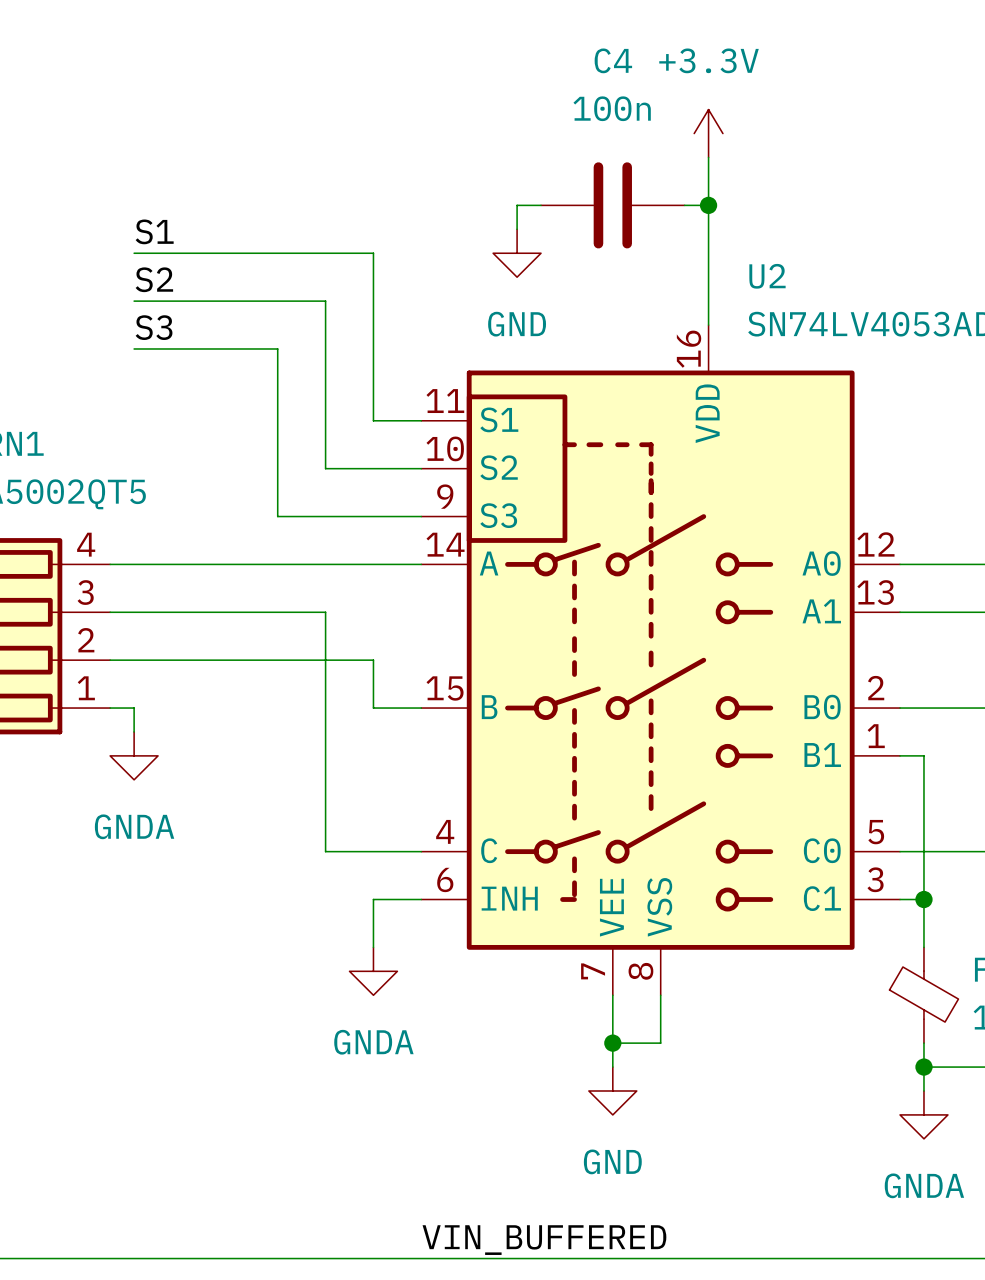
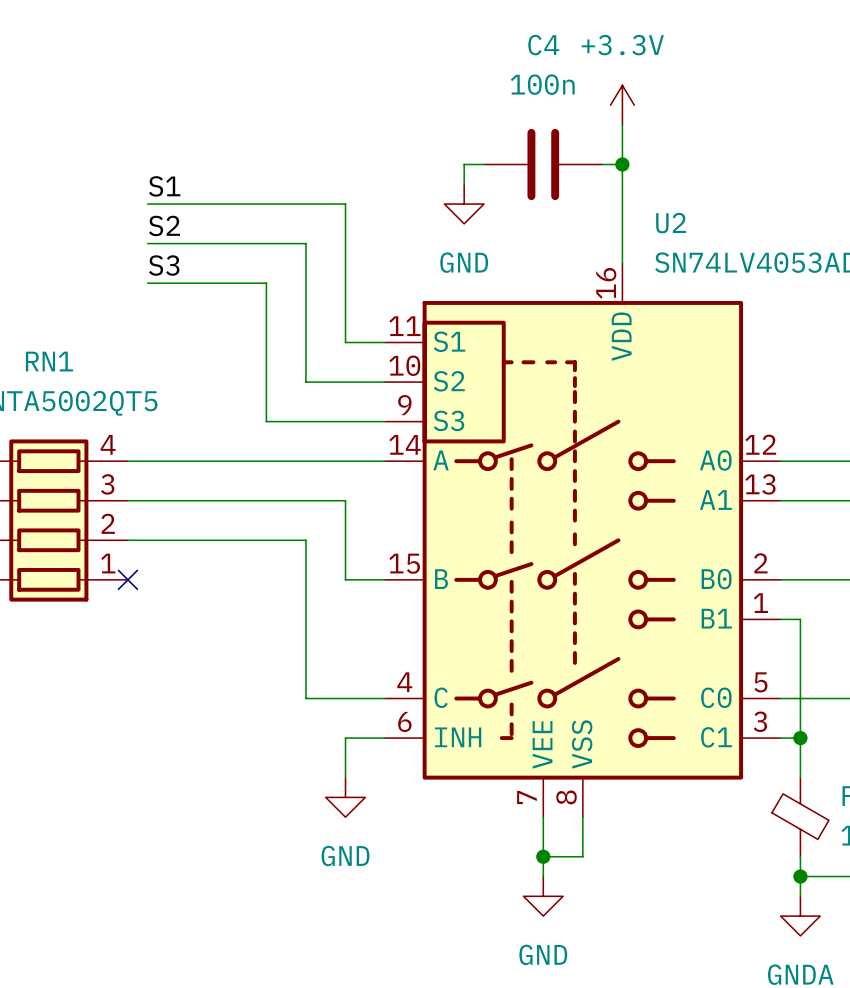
wire: (325, 612) (325, 660) (373, 660) -> (305, 500) (345, 500) (345, 540)
wire: (110, 708) (134, 708) (134, 731) -> none
no-connect mark: none -> (127, 579)
power symbol: GNDA (134, 755) -> none
power symbol: GNDA (373, 971) -> GND (345, 797)

